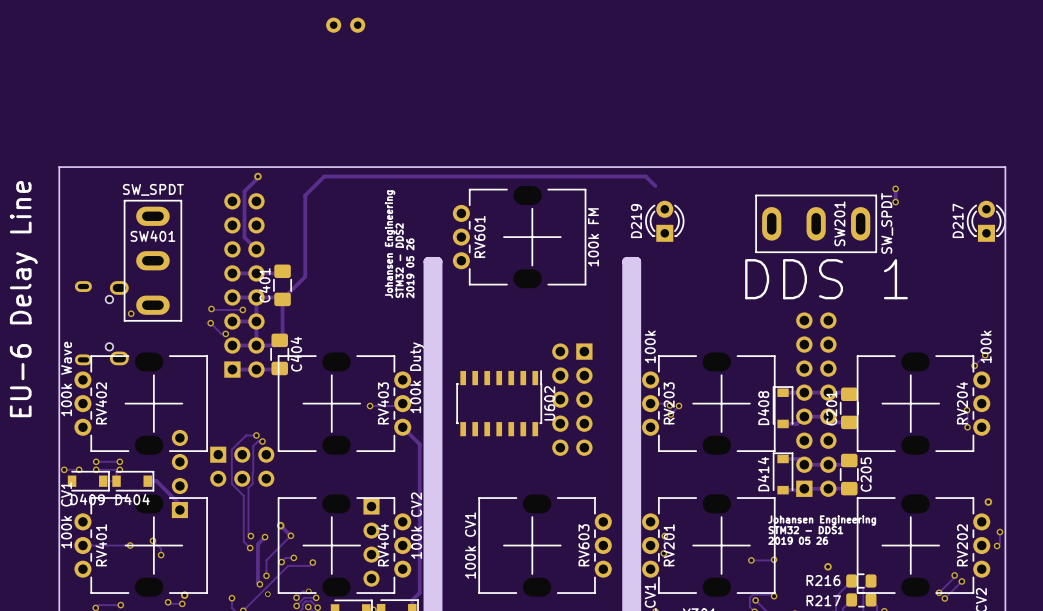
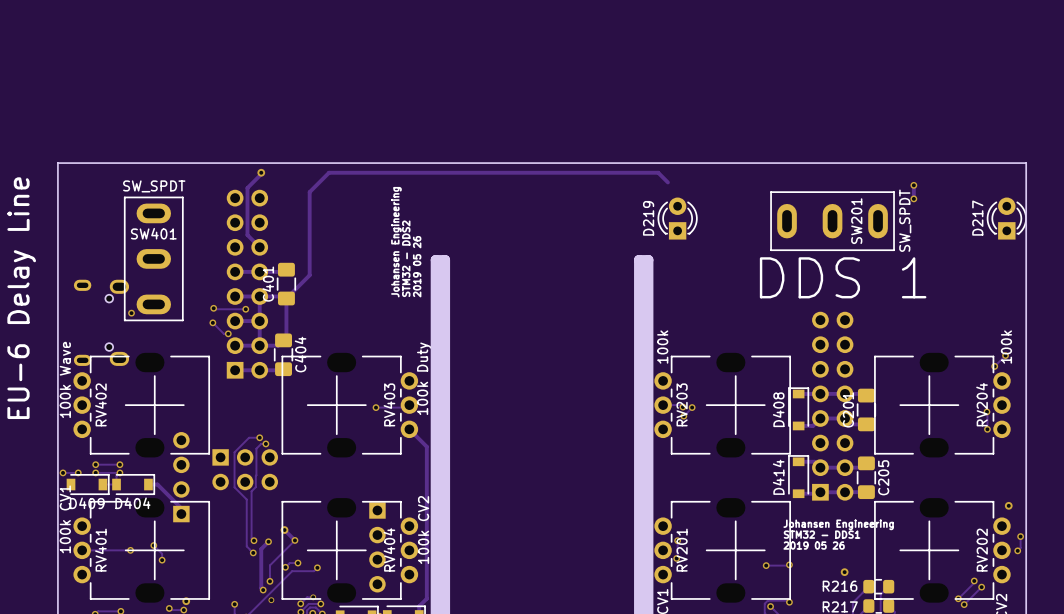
part: (345, 25) -> none
RV601: 100k FM (519, 237) -> none
part: (572, 399) -> none
U602: (499, 403) -> none
RV603: 100k CV1 (545, 545) -> none

